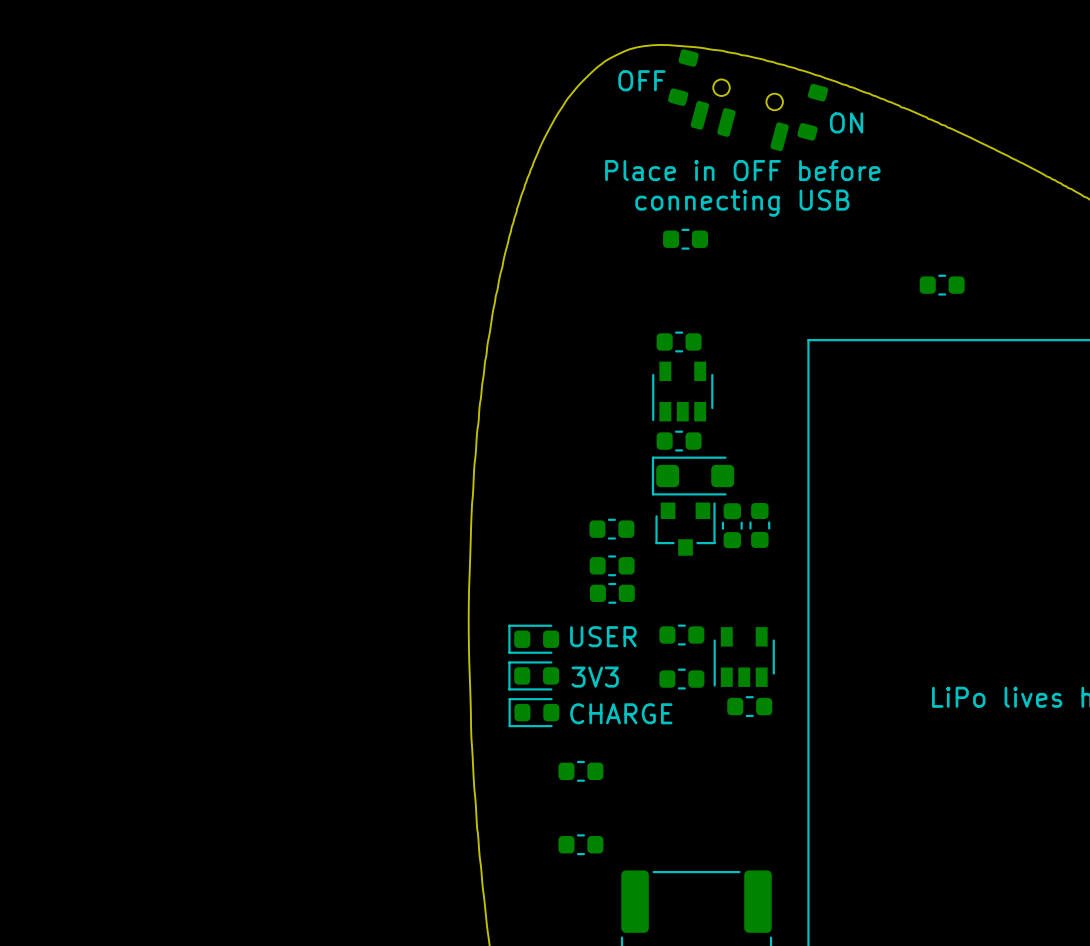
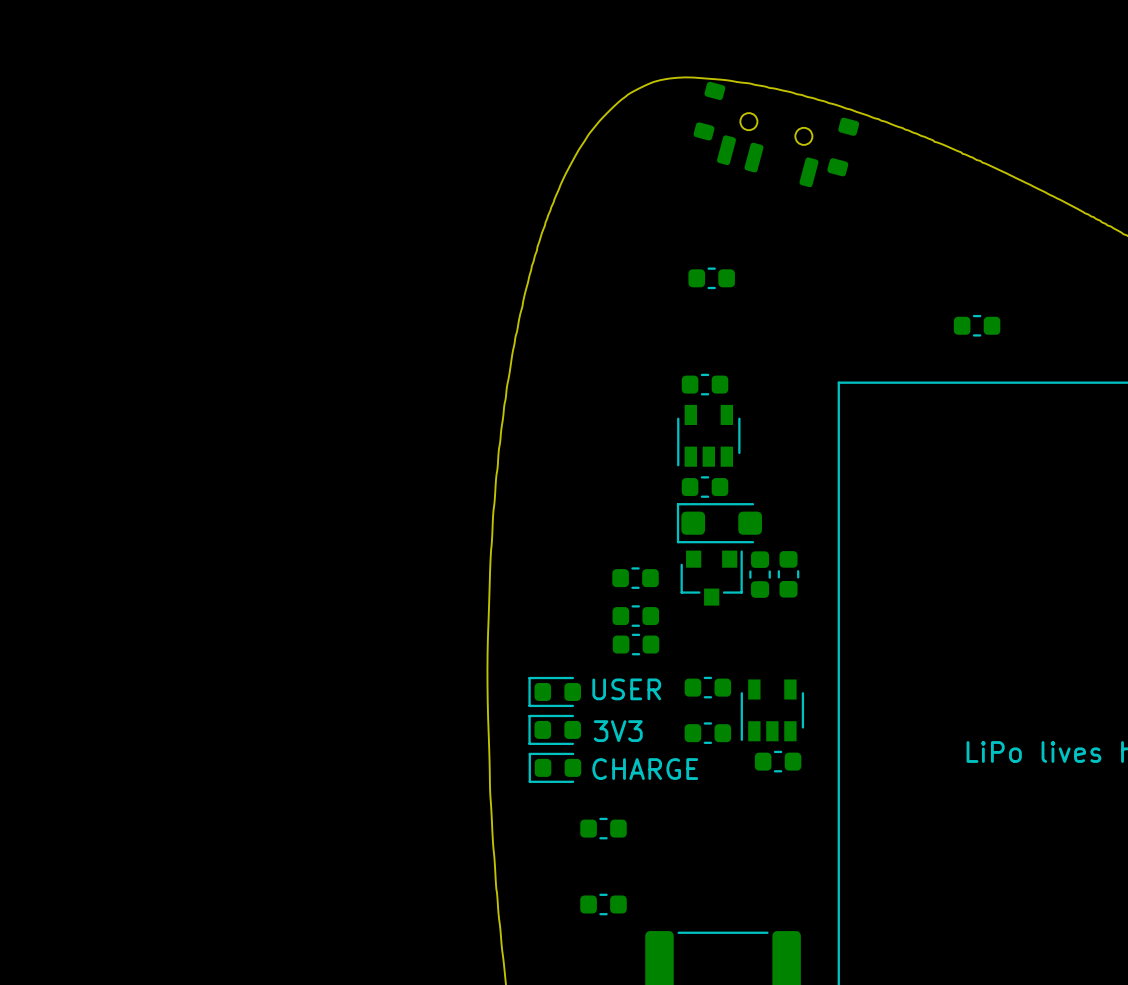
text: OFF (641, 80) -> none
text: ON (846, 122) -> none
text: Place in OFF before (742, 170) -> none
text: connecting USB (742, 203) -> none

